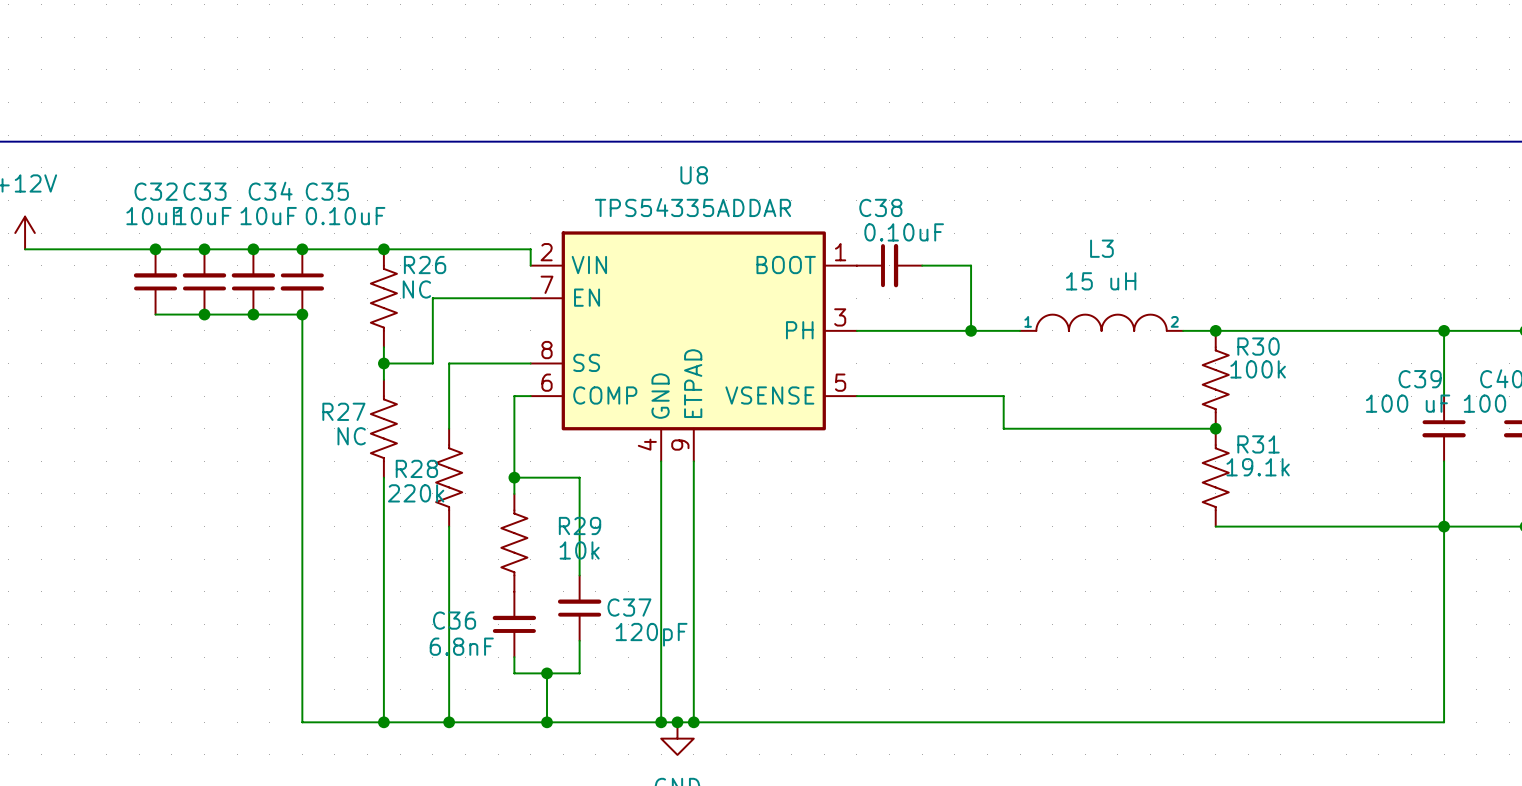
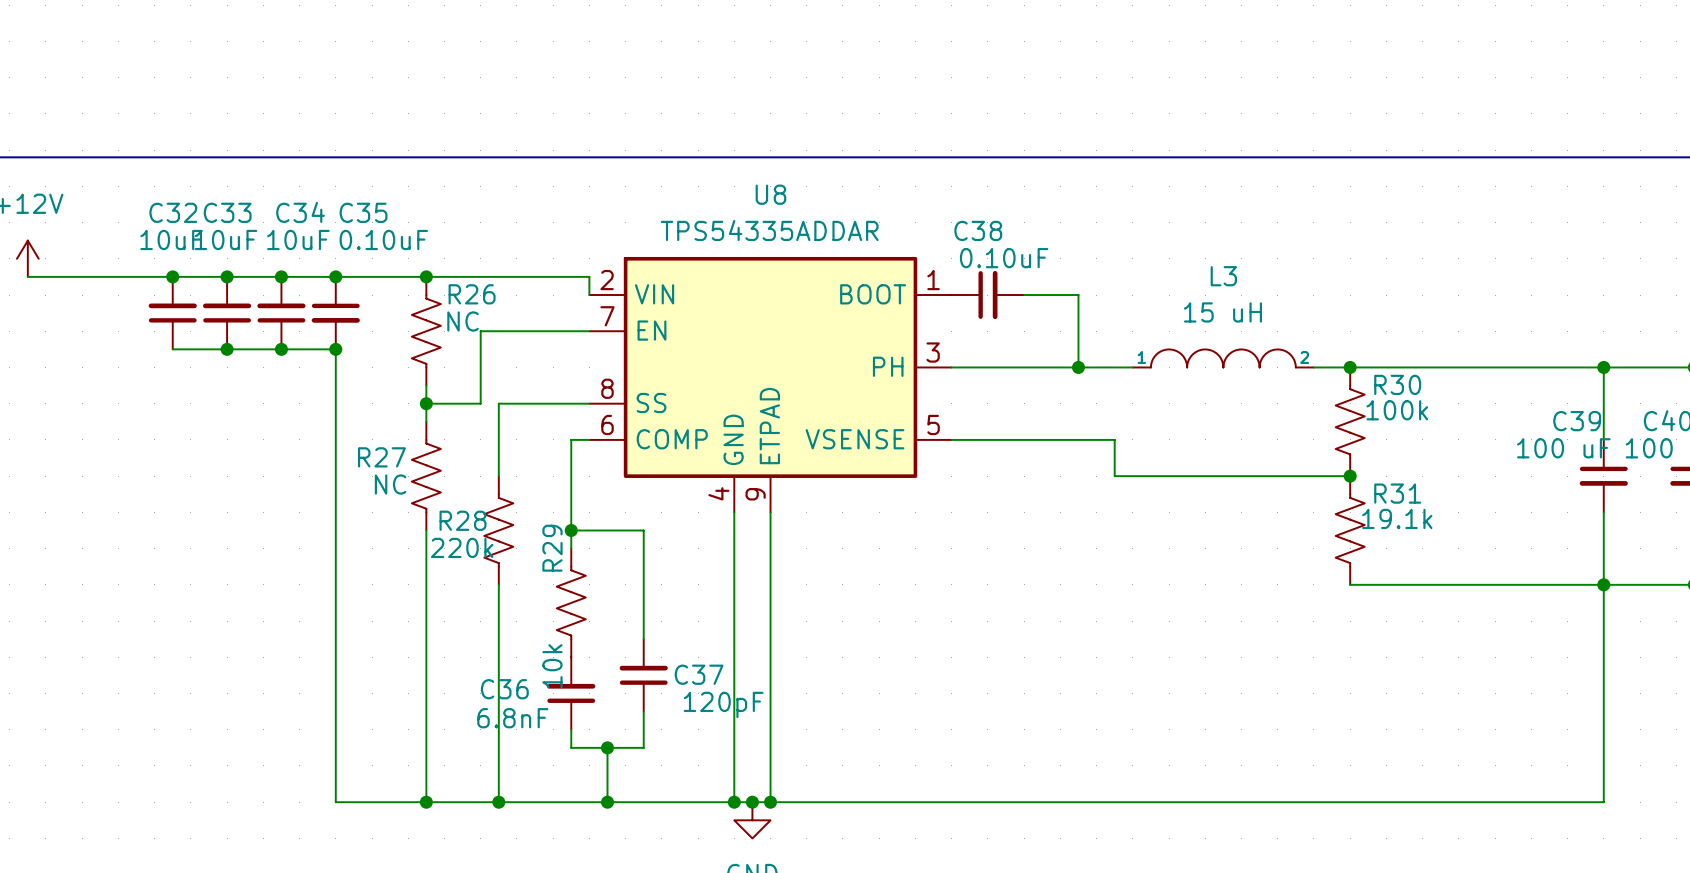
R29 name rotation: 0° (580, 525) -> 90° counterclockwise (552, 548)
R29 name position: R29 (580, 525) -> R29 (552, 548)
R29 value rotation: 0° (579, 550) -> 90° counterclockwise (552, 666)
R29 value position: 10k (579, 550) -> 10k (552, 666)

